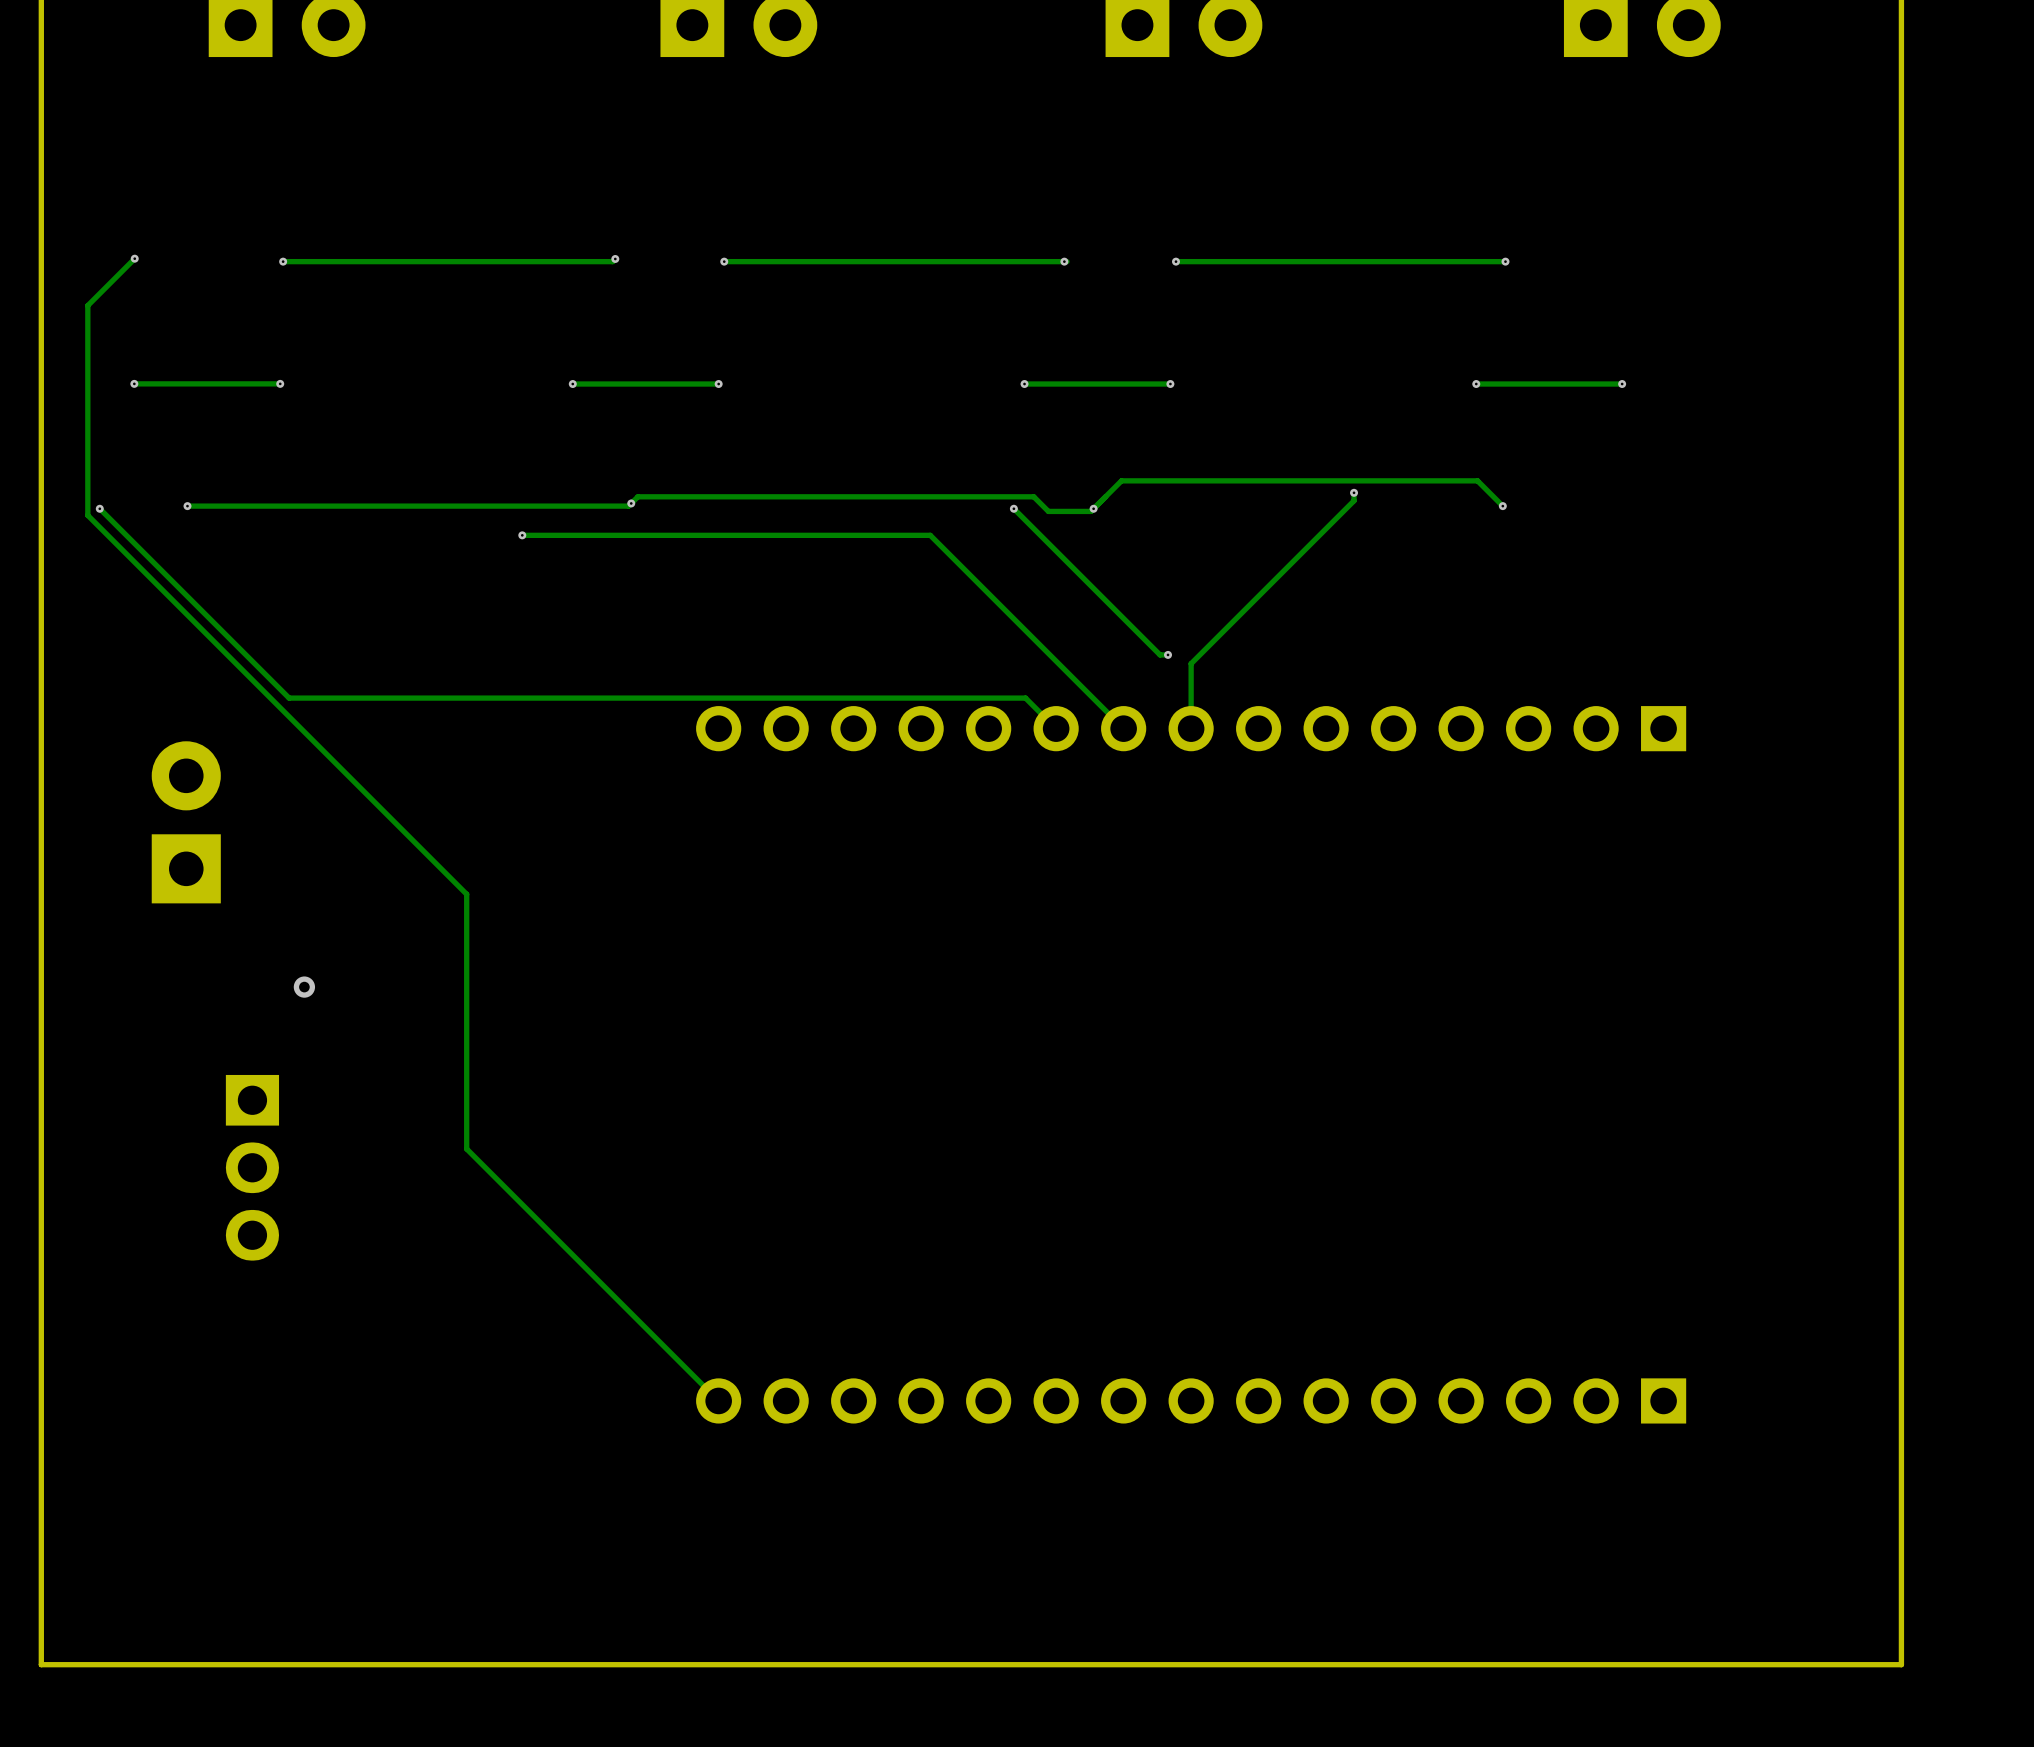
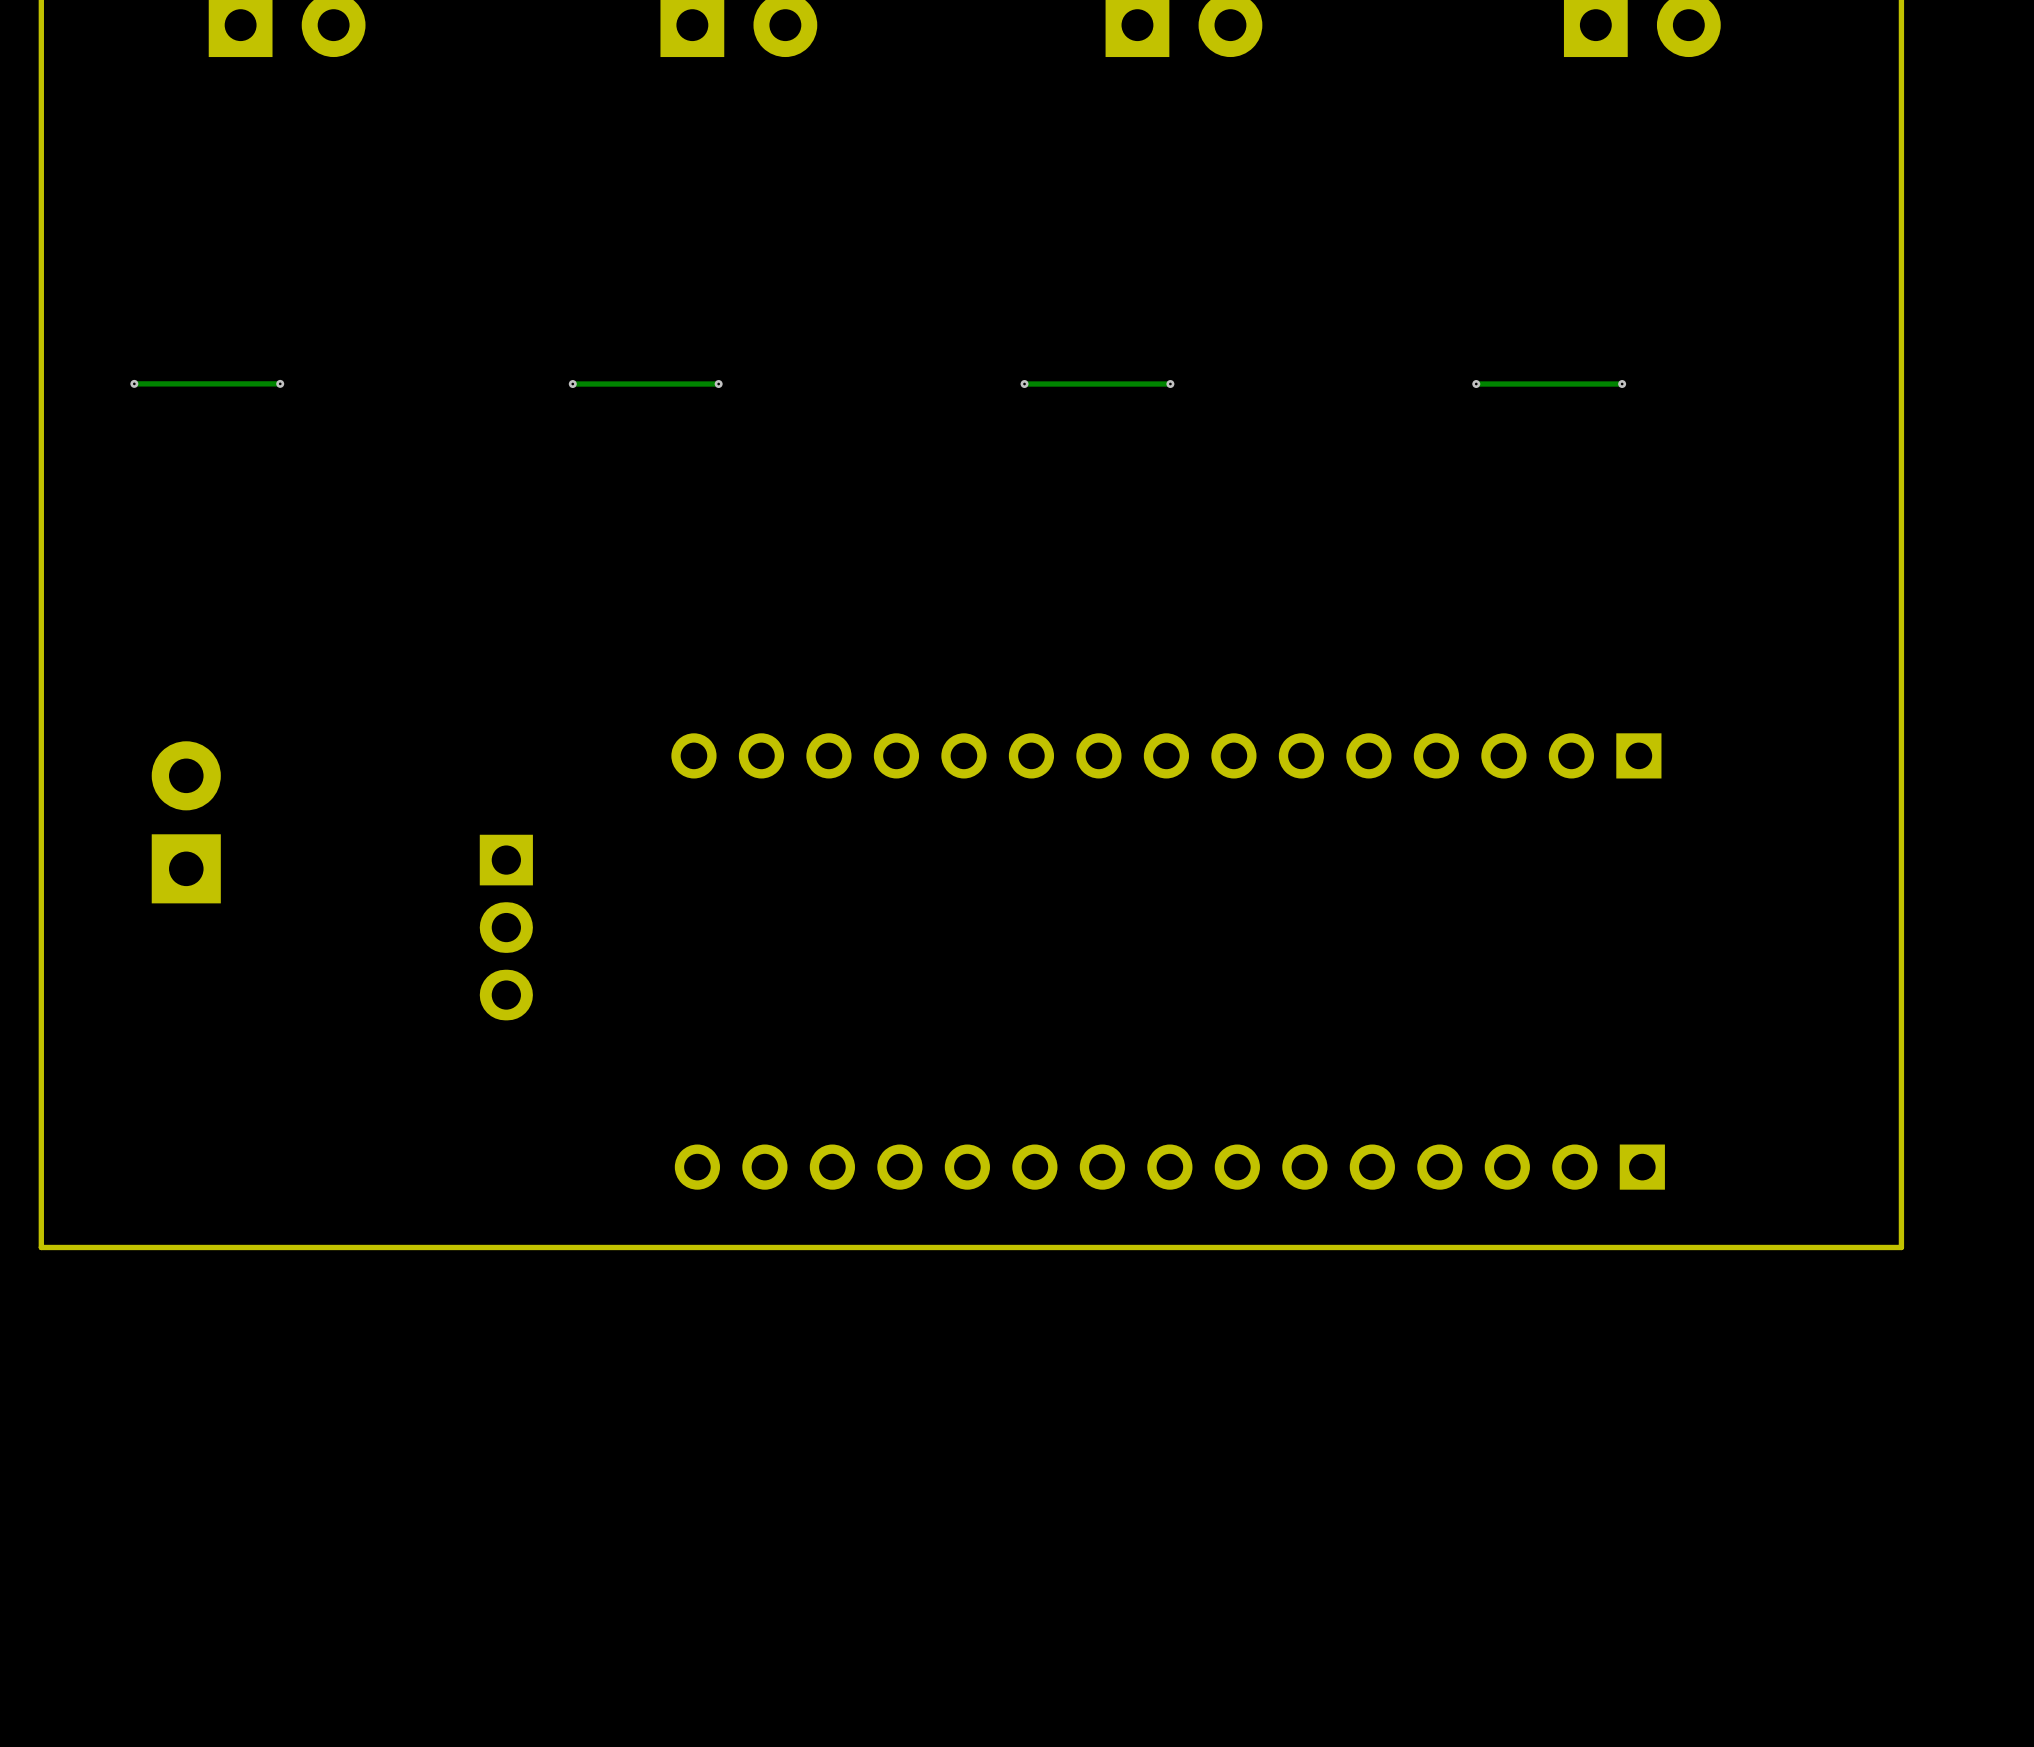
track: (134, 258) (87, 305) (87, 515) (466, 894) (466, 1148) (718, 1400) -> none
via: (134, 258) -> none
track: (615, 258) (612, 261) (283, 261) -> none
via: (615, 258) -> none
via: (283, 261) -> none
via: (724, 261) -> none
via: (1064, 261) -> none
track: (1067, 261) (724, 261) -> none
via: (1175, 261) -> none
track: (1505, 261) (1175, 261) -> none
via: (1505, 261) -> none
track: (1354, 492) (1354, 500) (1191, 663) (1191, 728) -> none
via: (1354, 492) -> none
via: (631, 503) -> none
via: (187, 506) -> none
track: (1502, 506) (1477, 480) (1121, 480) (1090, 511) (1048, 511) (1033, 496) (637, 496) (628, 506) (187, 506) -> none
via: (1502, 506) -> none
track: (99, 508) (289, 698) (1025, 698) (1056, 728) -> none
via: (99, 508) -> none
track: (1013, 508) (1160, 654) (1168, 654) -> none
via: (1013, 508) -> none
via: (1093, 508) -> none
track: (522, 535) (930, 535) (1123, 728) -> none
via: (522, 535) -> none
via: (1168, 654) -> none
part position: (1191, 728) -> (1166, 755)
via: (304, 987) -> none
part position: (252, 1167) -> (506, 927)
part: none -> (1169, 1167)
board edge: (1901, 1247) (1901, 1664) (41, 1664) (41, 1247) -> (1901, 1247) (41, 1247)
part: (1191, 1400) -> none

